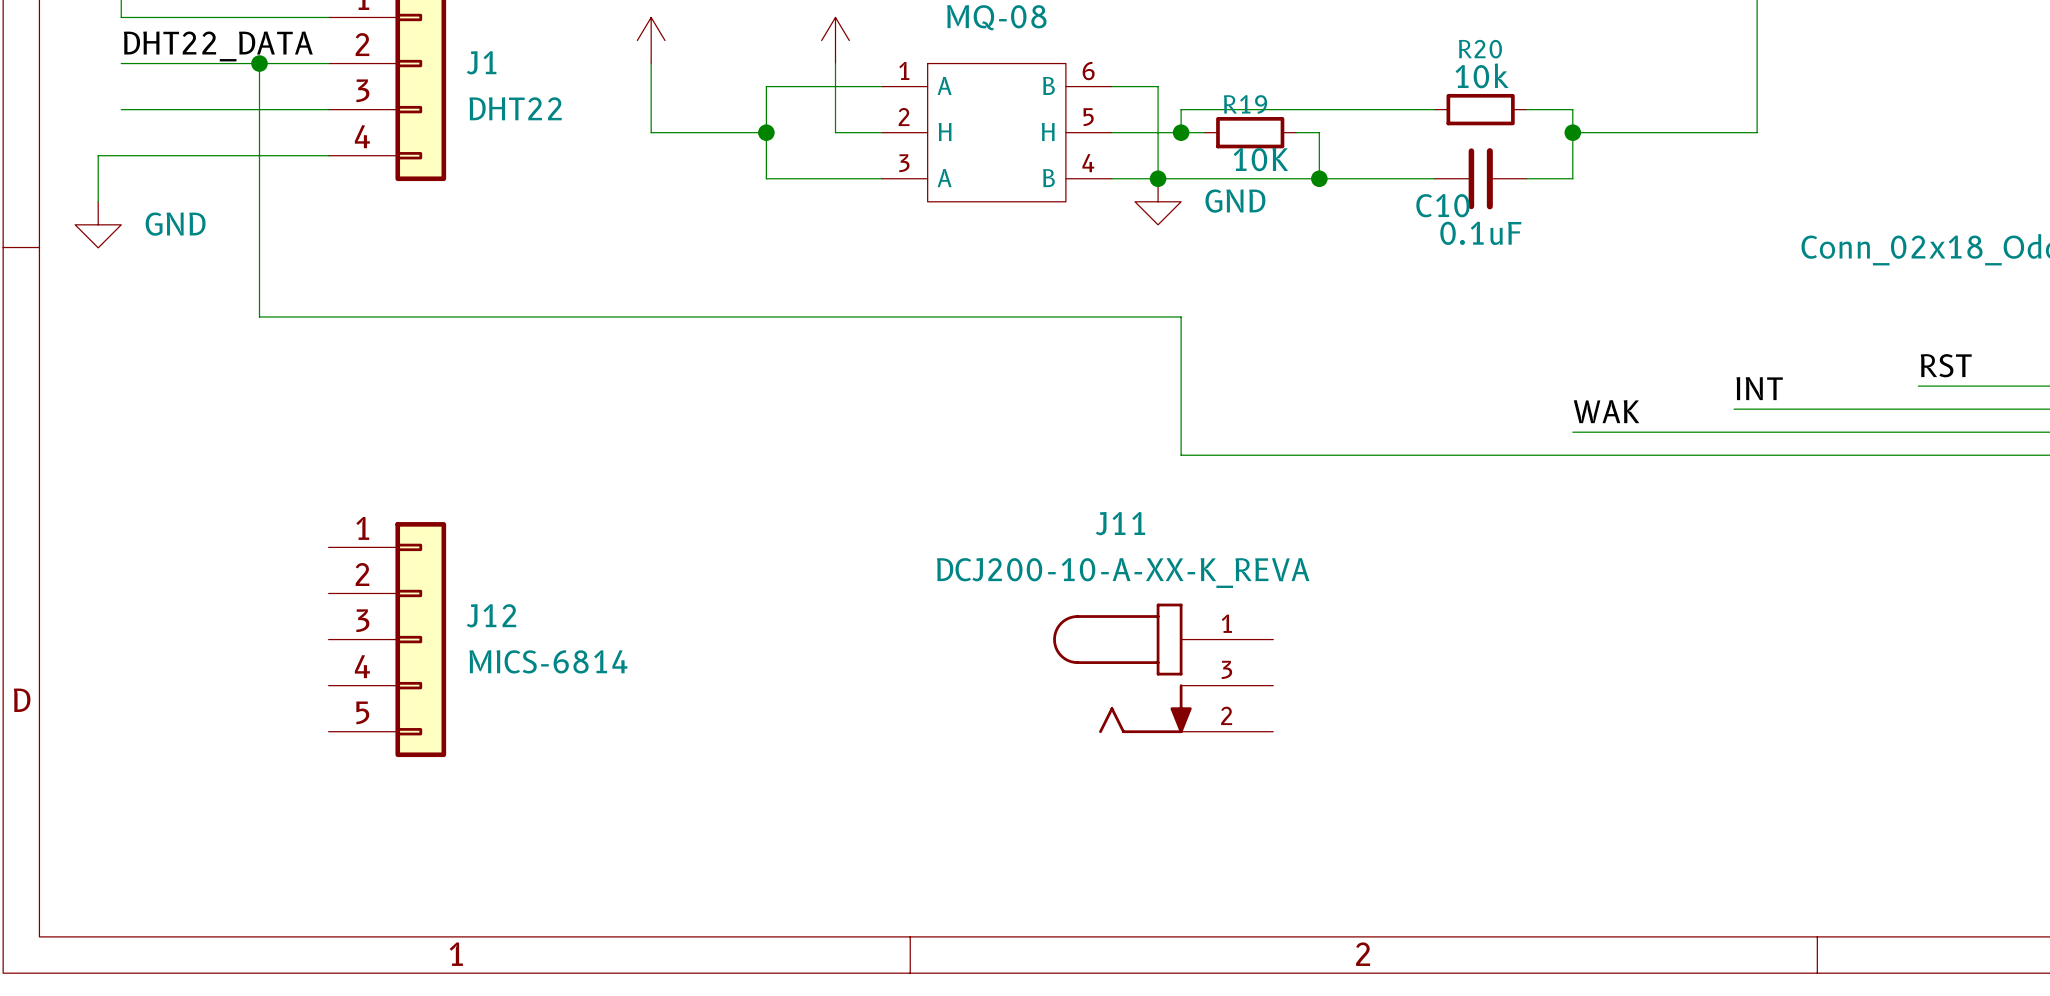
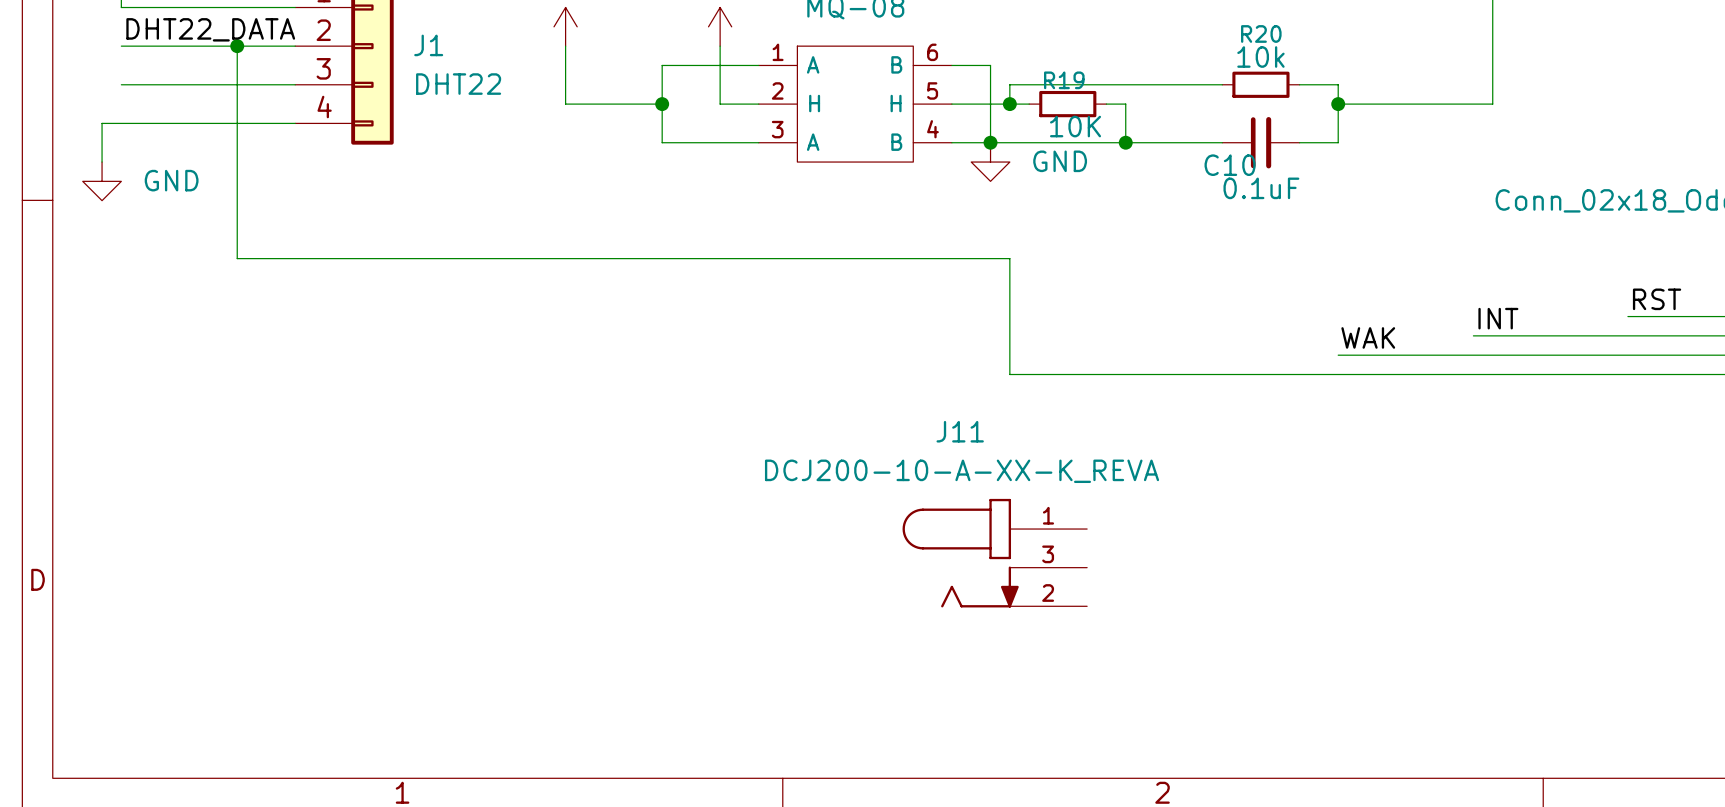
J12: MICS-6814 (387, 639) -> none

